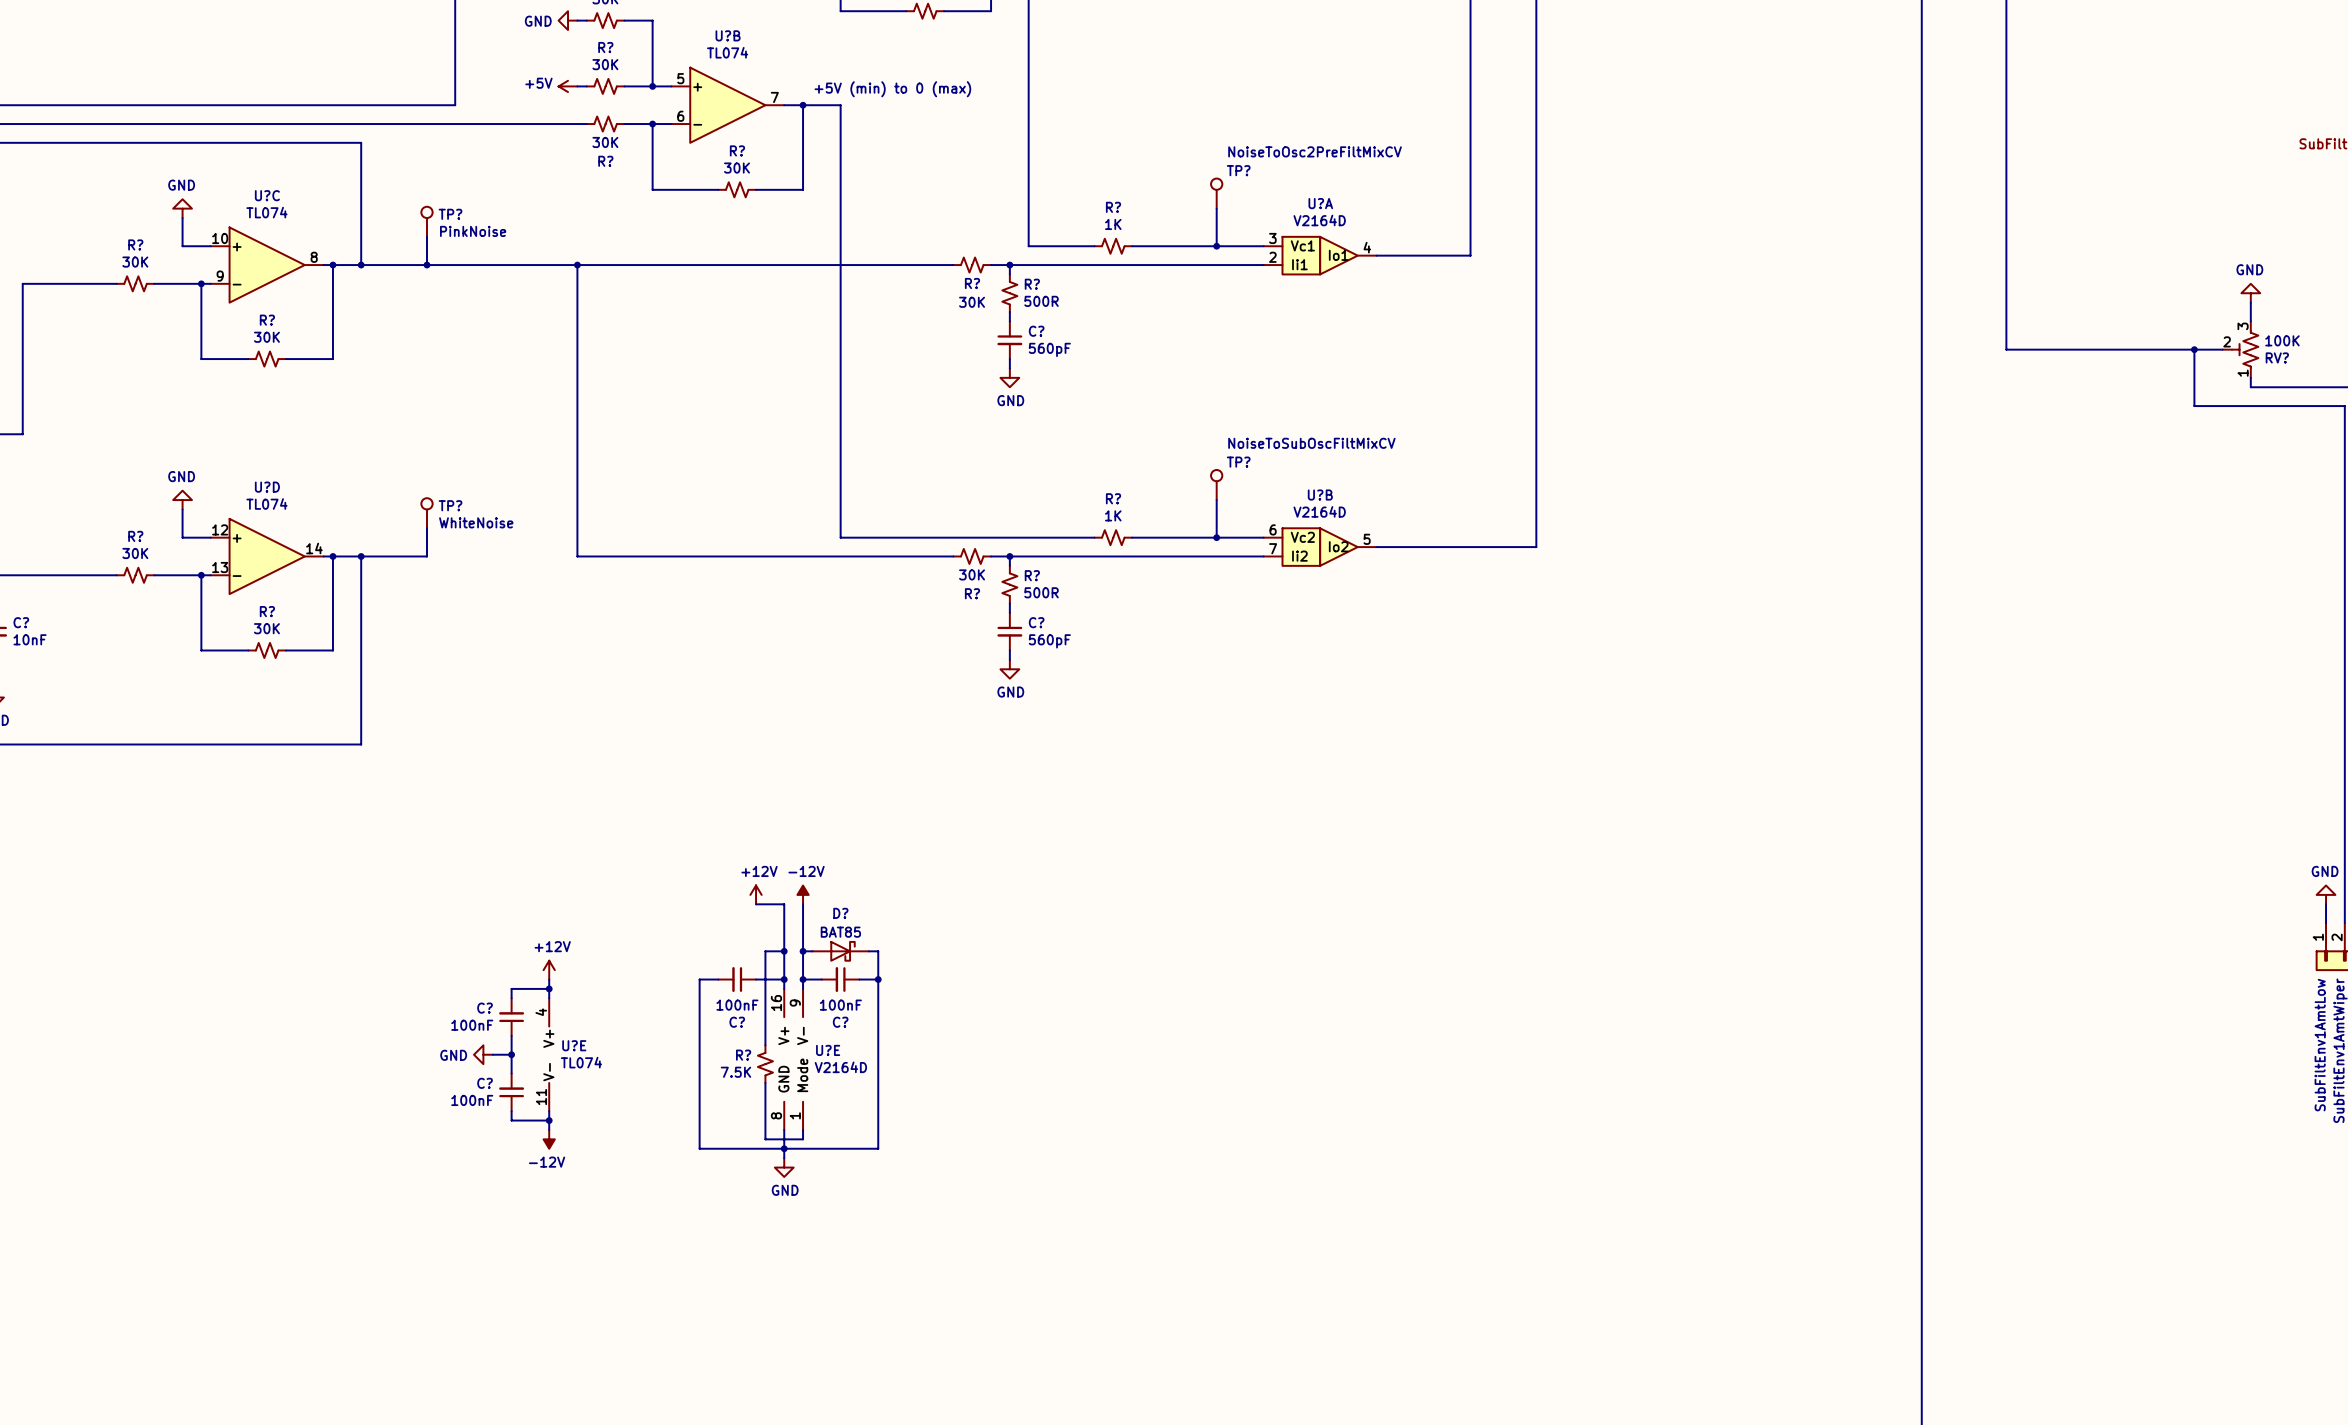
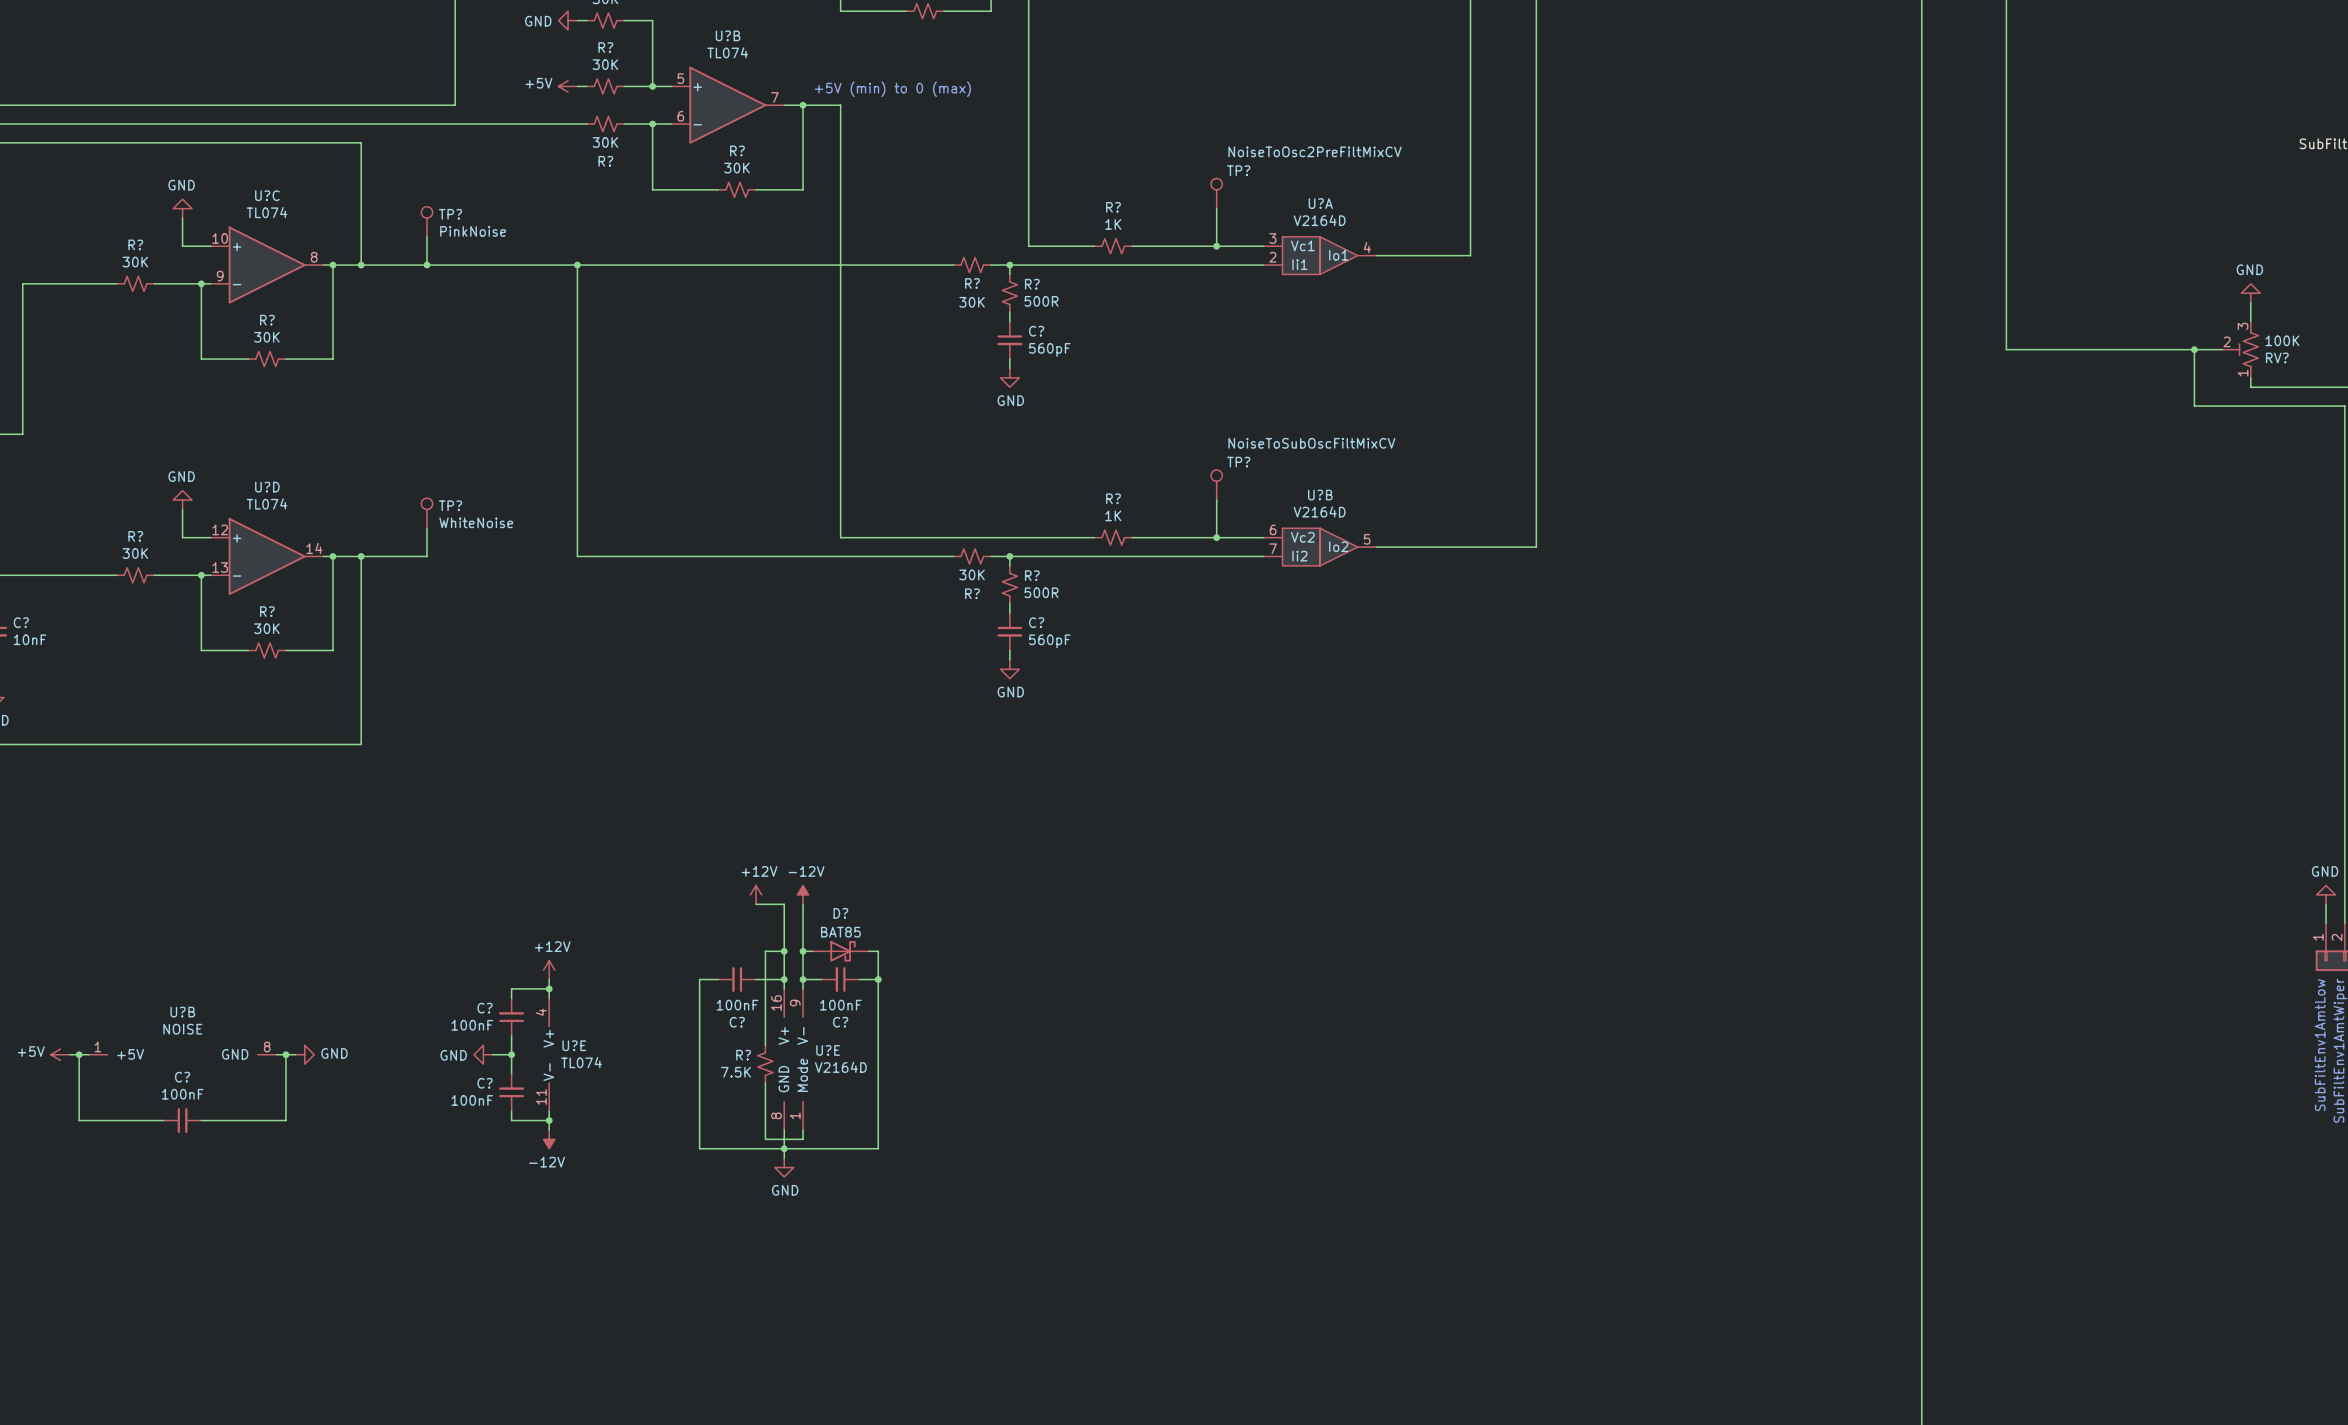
power symbol: none -> +5V (60, 1054)
wire: none -> (69, 1054) (88, 1054)
wire: none -> (79, 1054) (79, 1120) (163, 1120)
junction: none -> (79, 1054)
U?B: none -> NOISE (182, 1054)
wire: none -> (276, 1054) (295, 1054)
wire: none -> (285, 1054) (285, 1120) (201, 1120)
junction: none -> (285, 1054)
power symbol: none -> GND (304, 1054)
C?: none -> 100nF (182, 1120)

